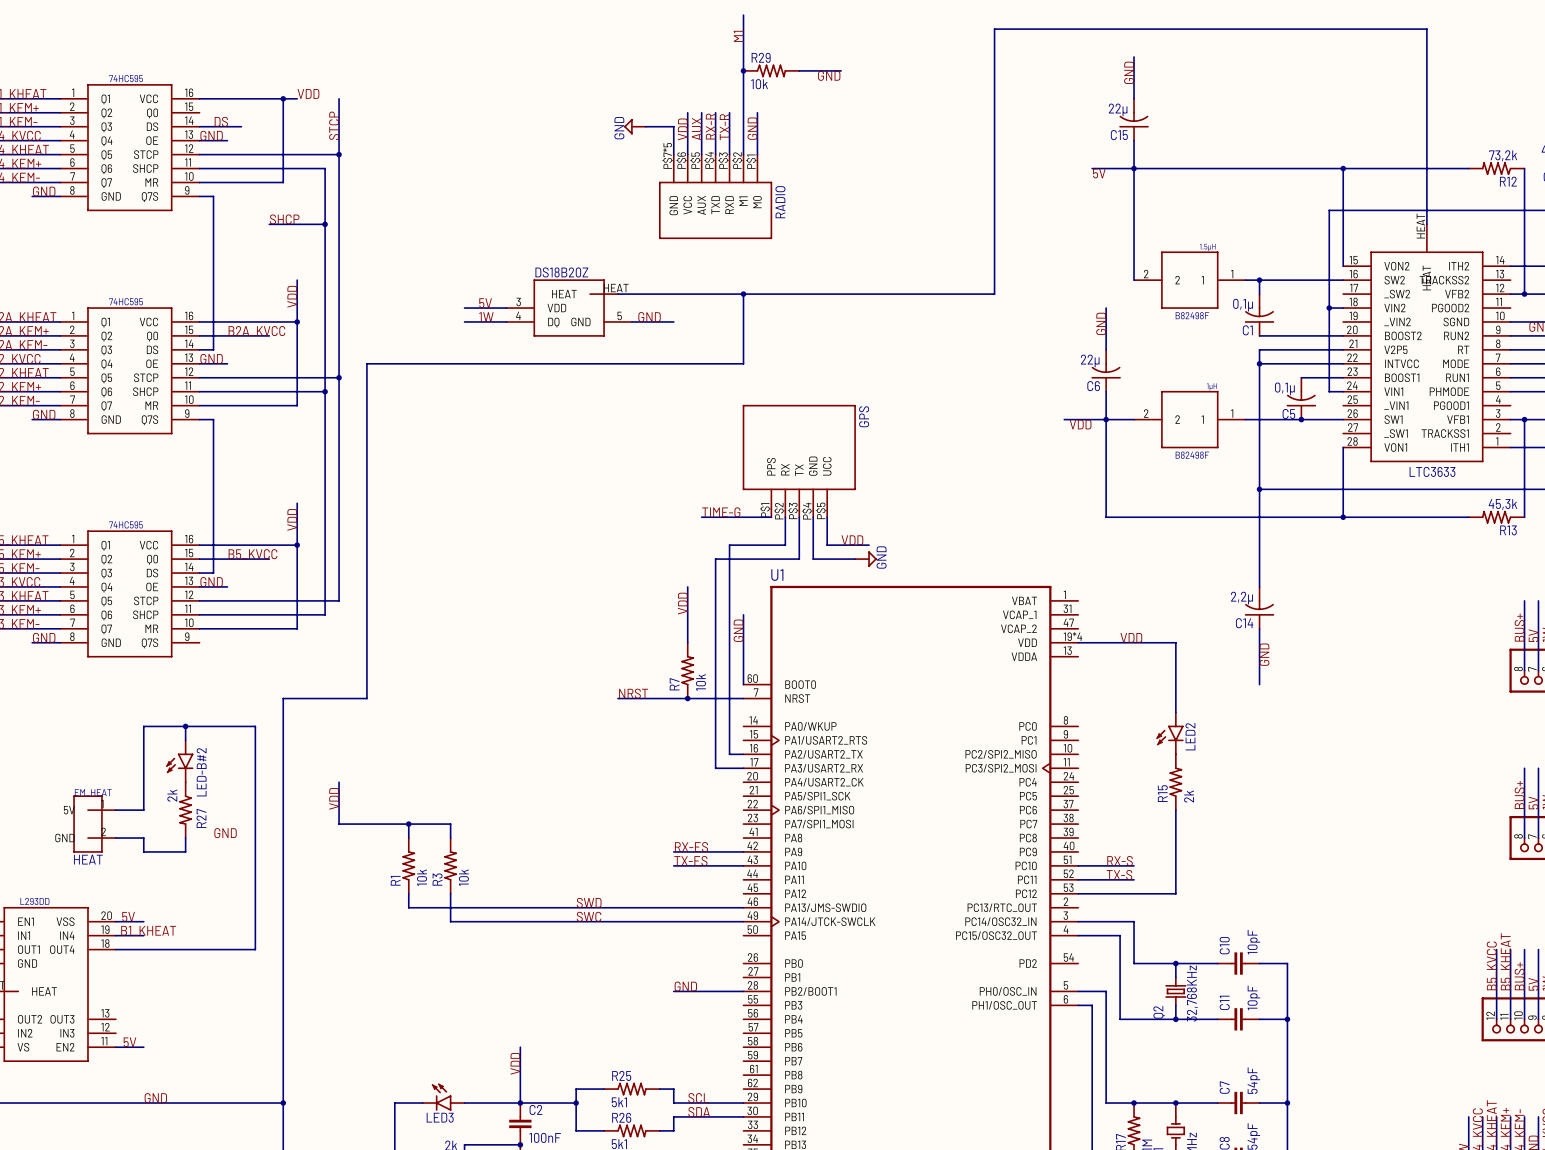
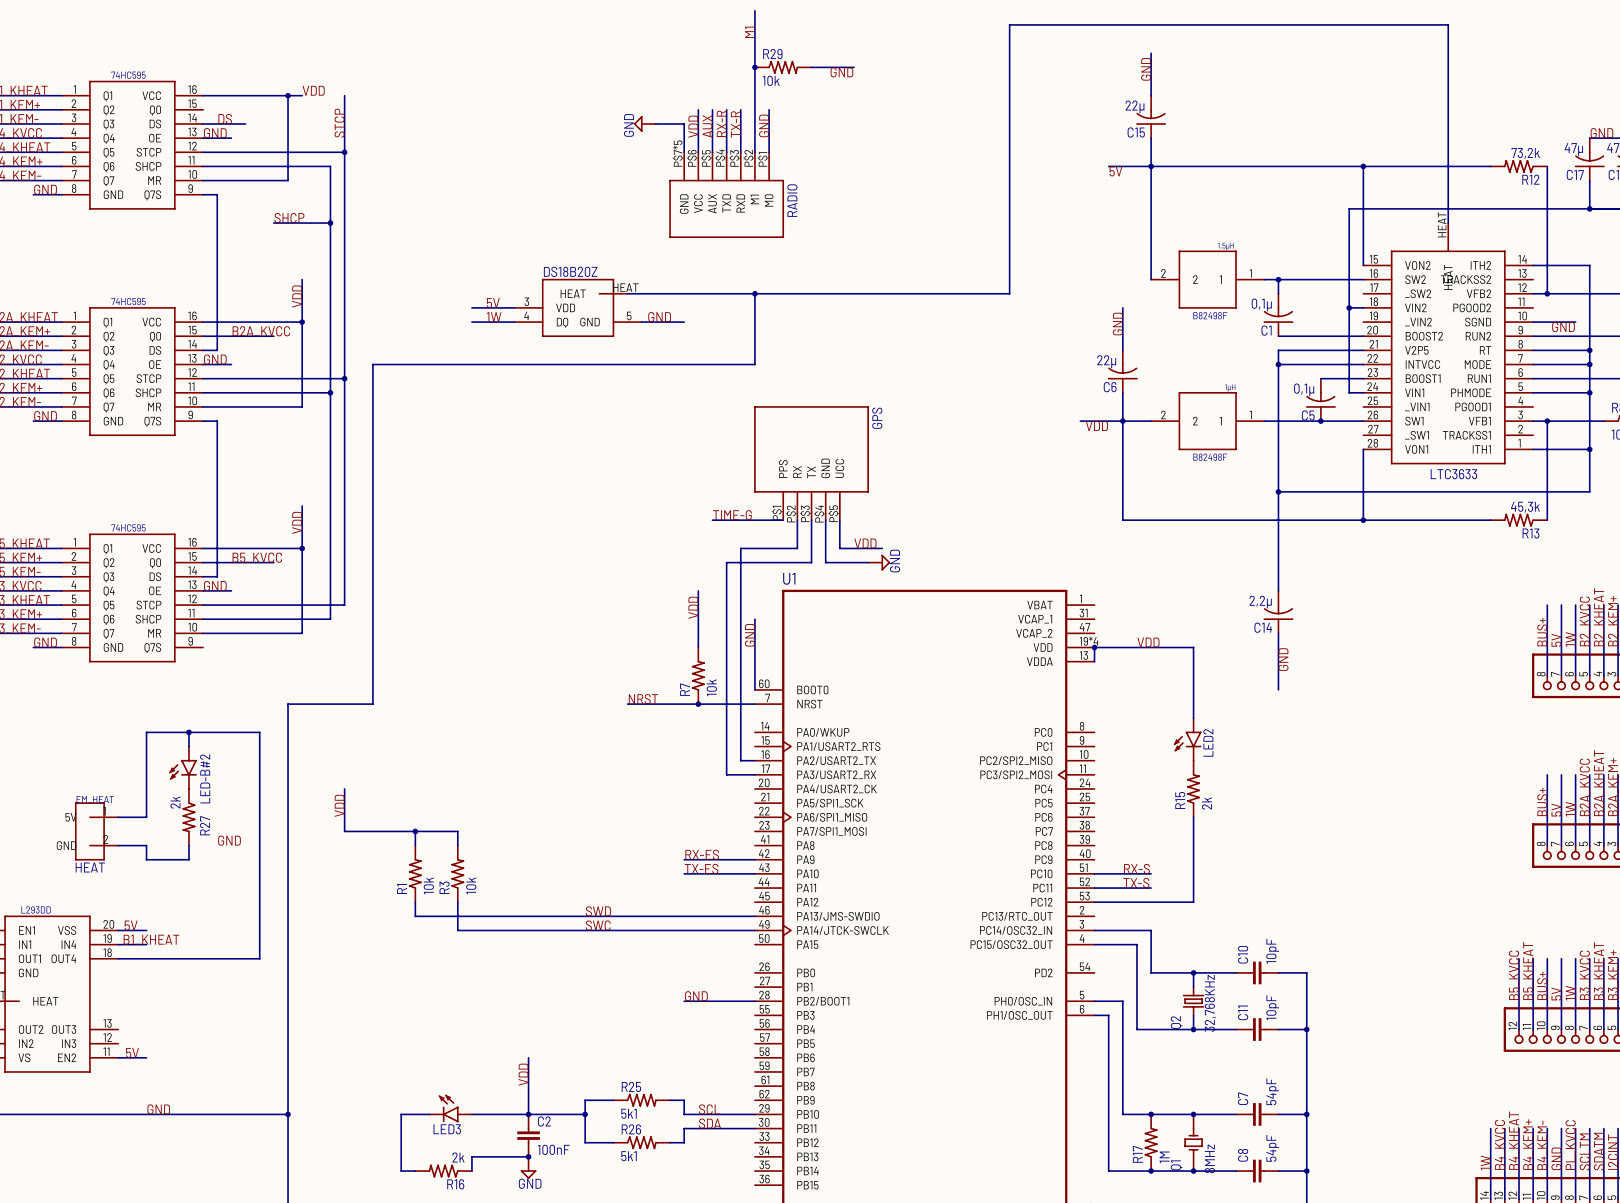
wire: none -> (1094, 647) (1094, 661)
junction: none -> (1094, 647)

